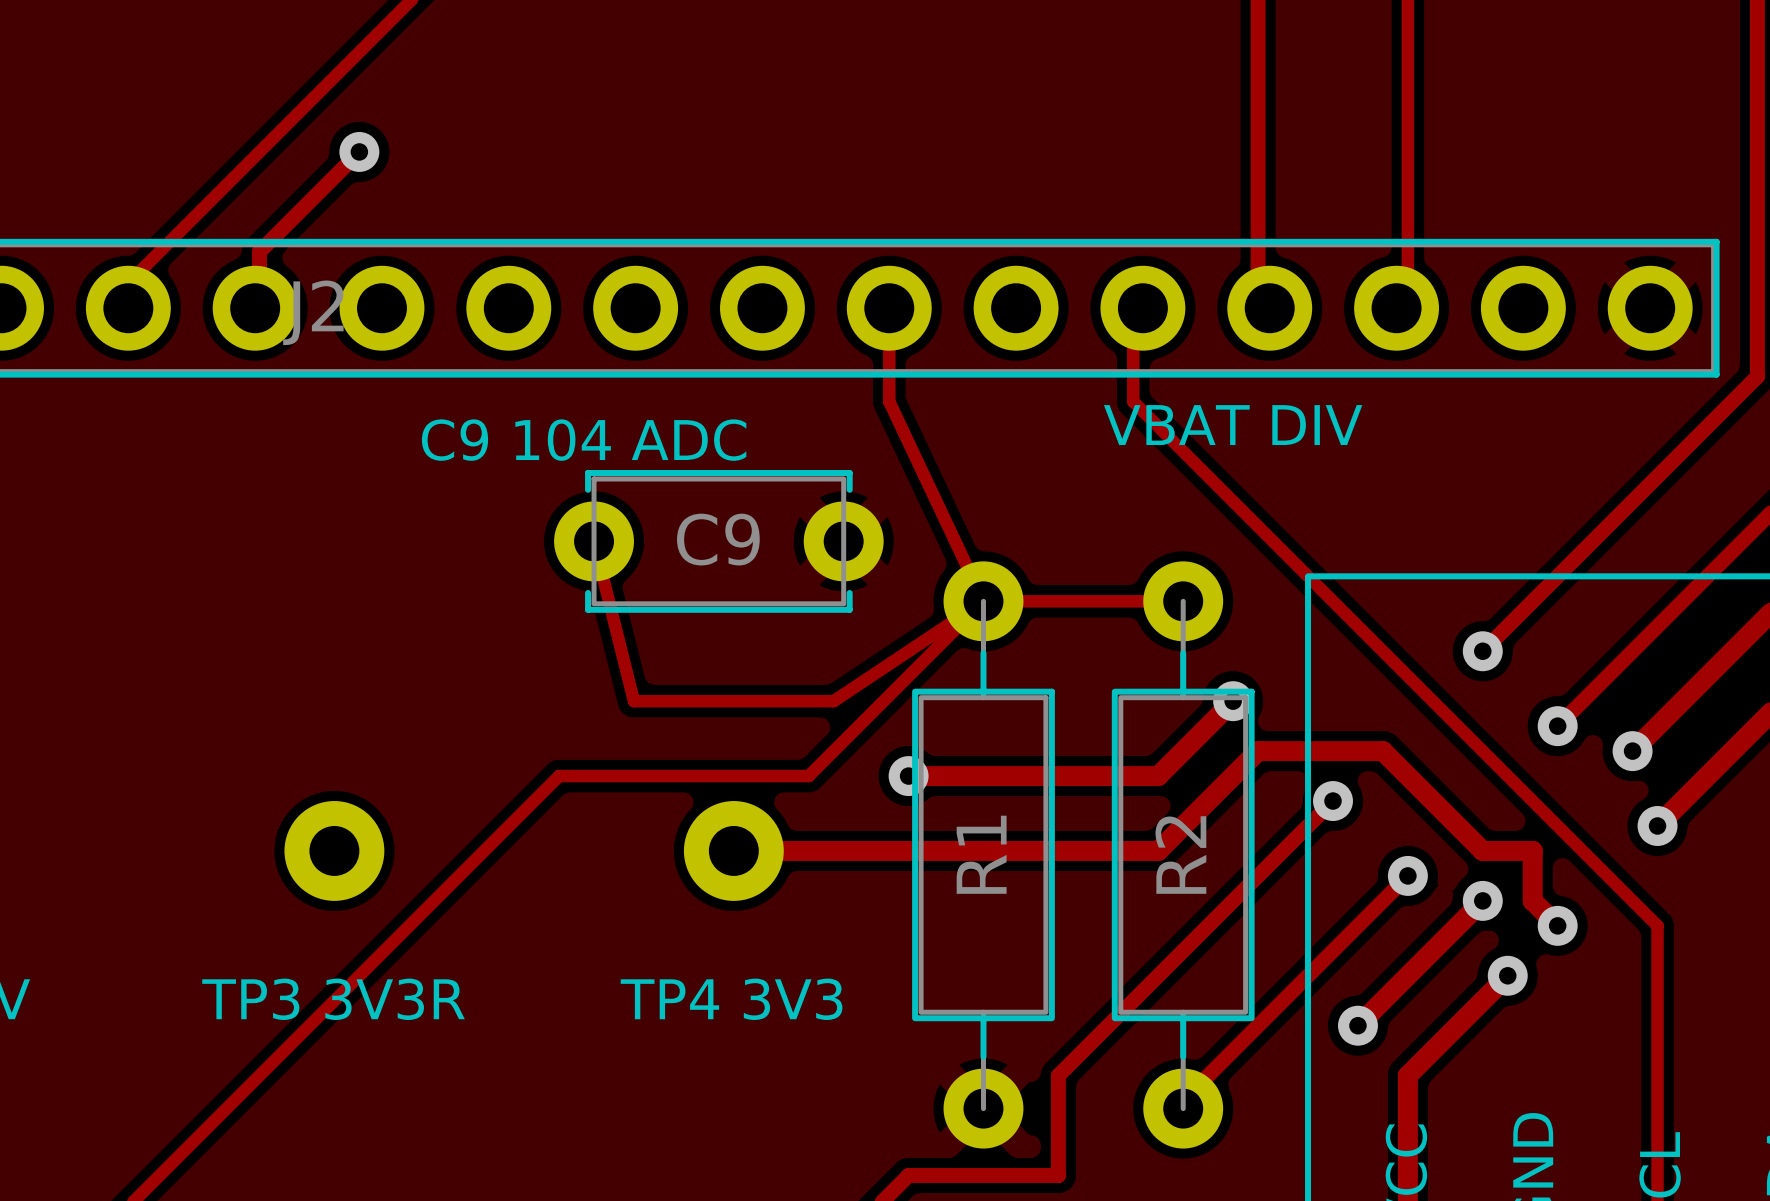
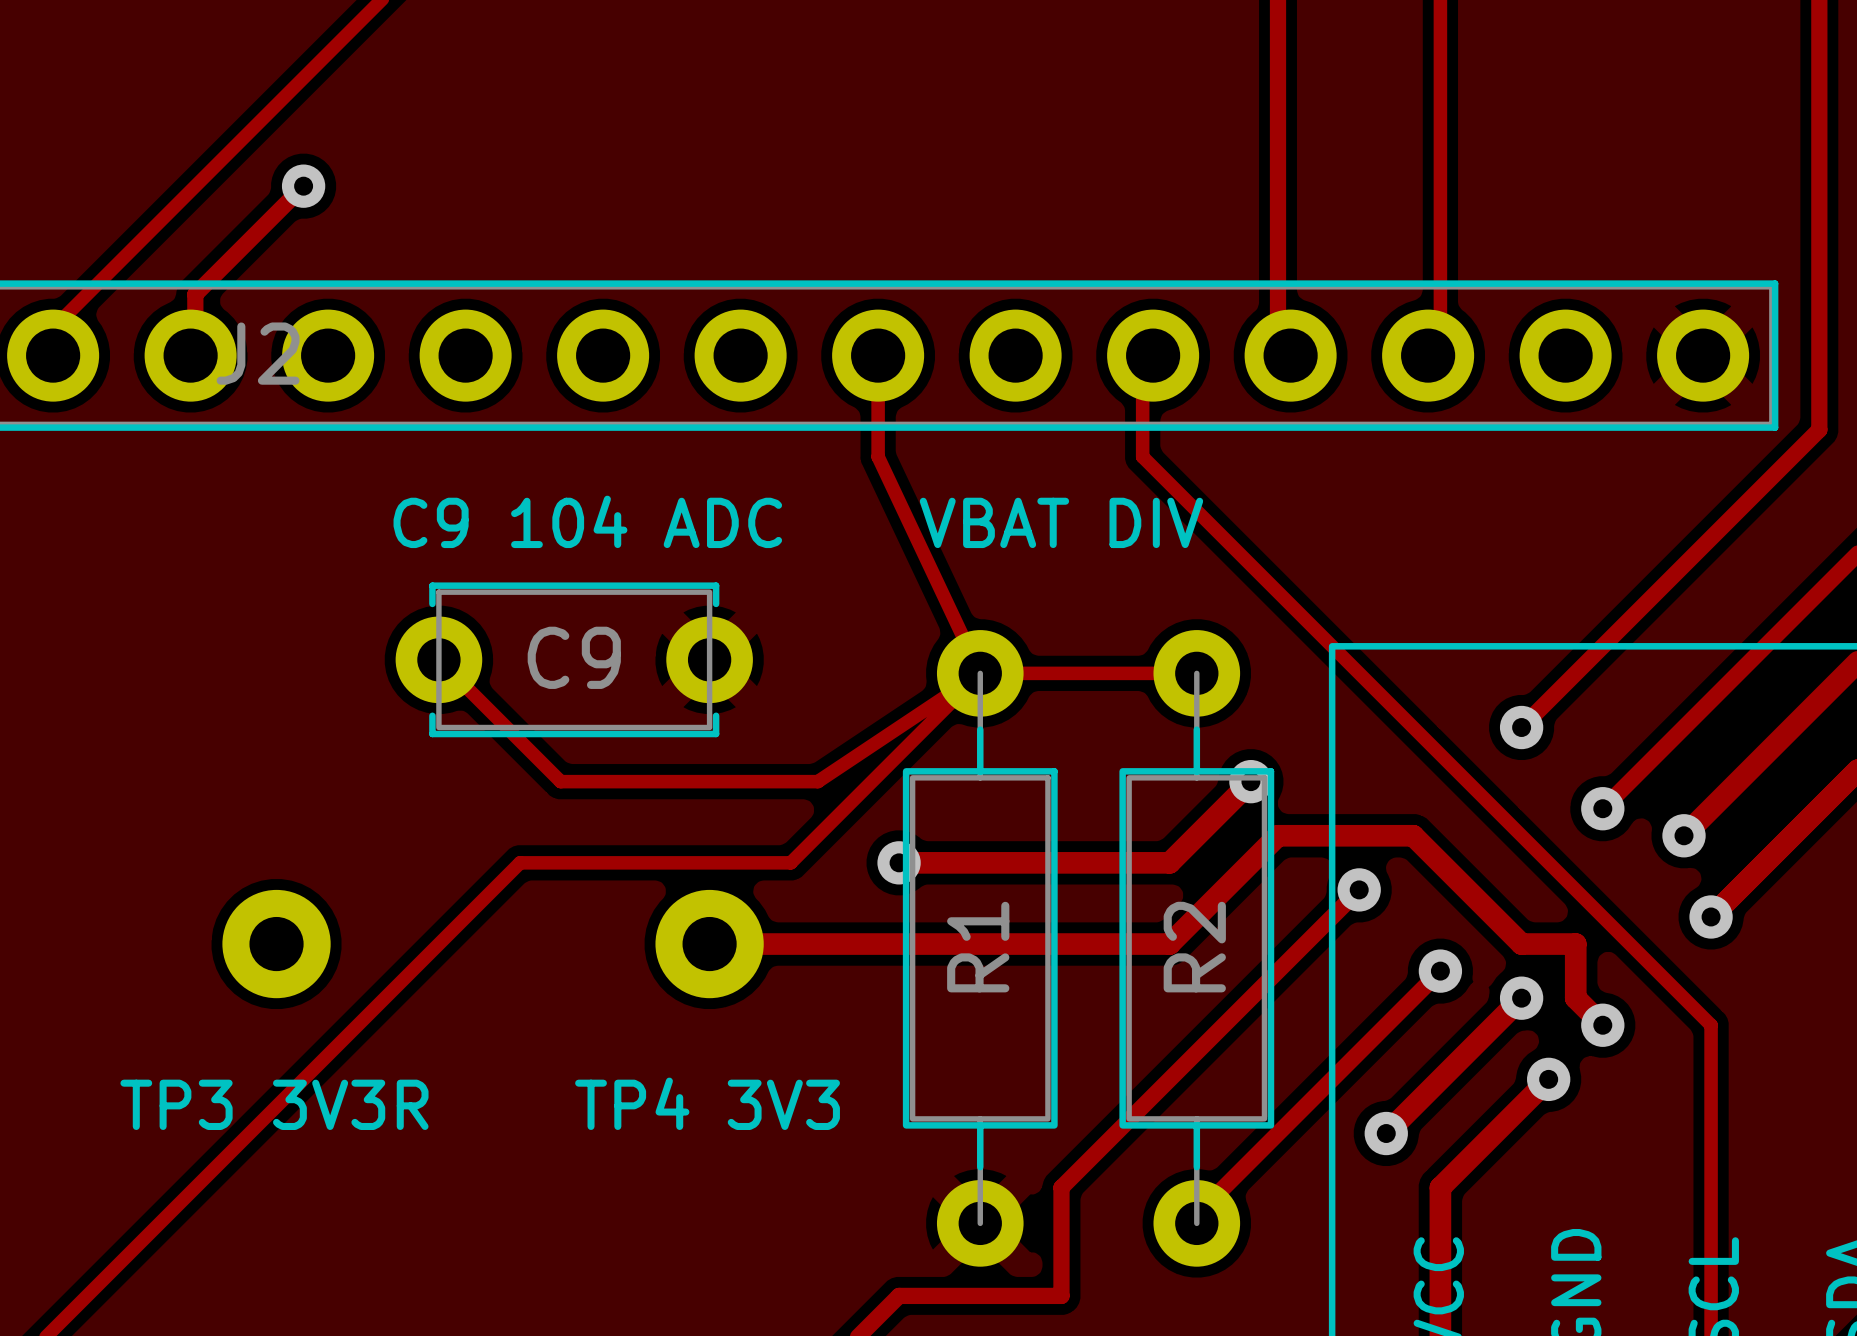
text position: VBAT DIV (1233, 425) -> VBAT DIV (1061, 522)
text position: C9 104 ADC (584, 440) -> C9 104 ADC (587, 521)
track: (594, 541) (633, 701) -> (438, 659) (560, 781) (601, 781)
C9 position: (718, 541) -> (574, 659)

